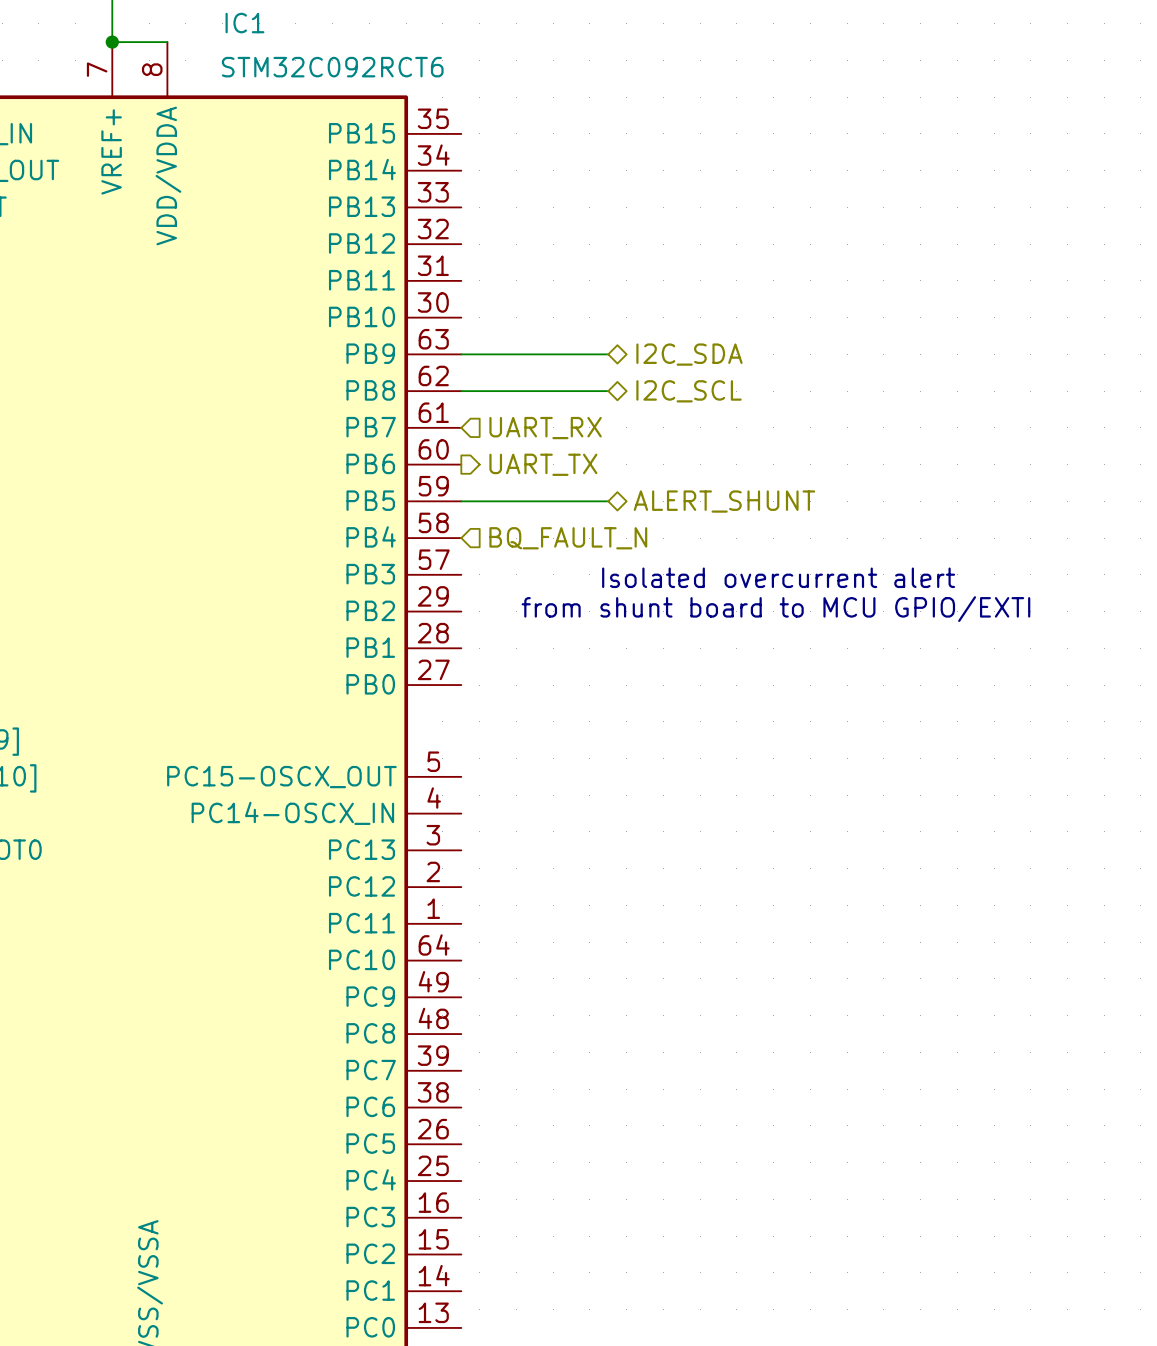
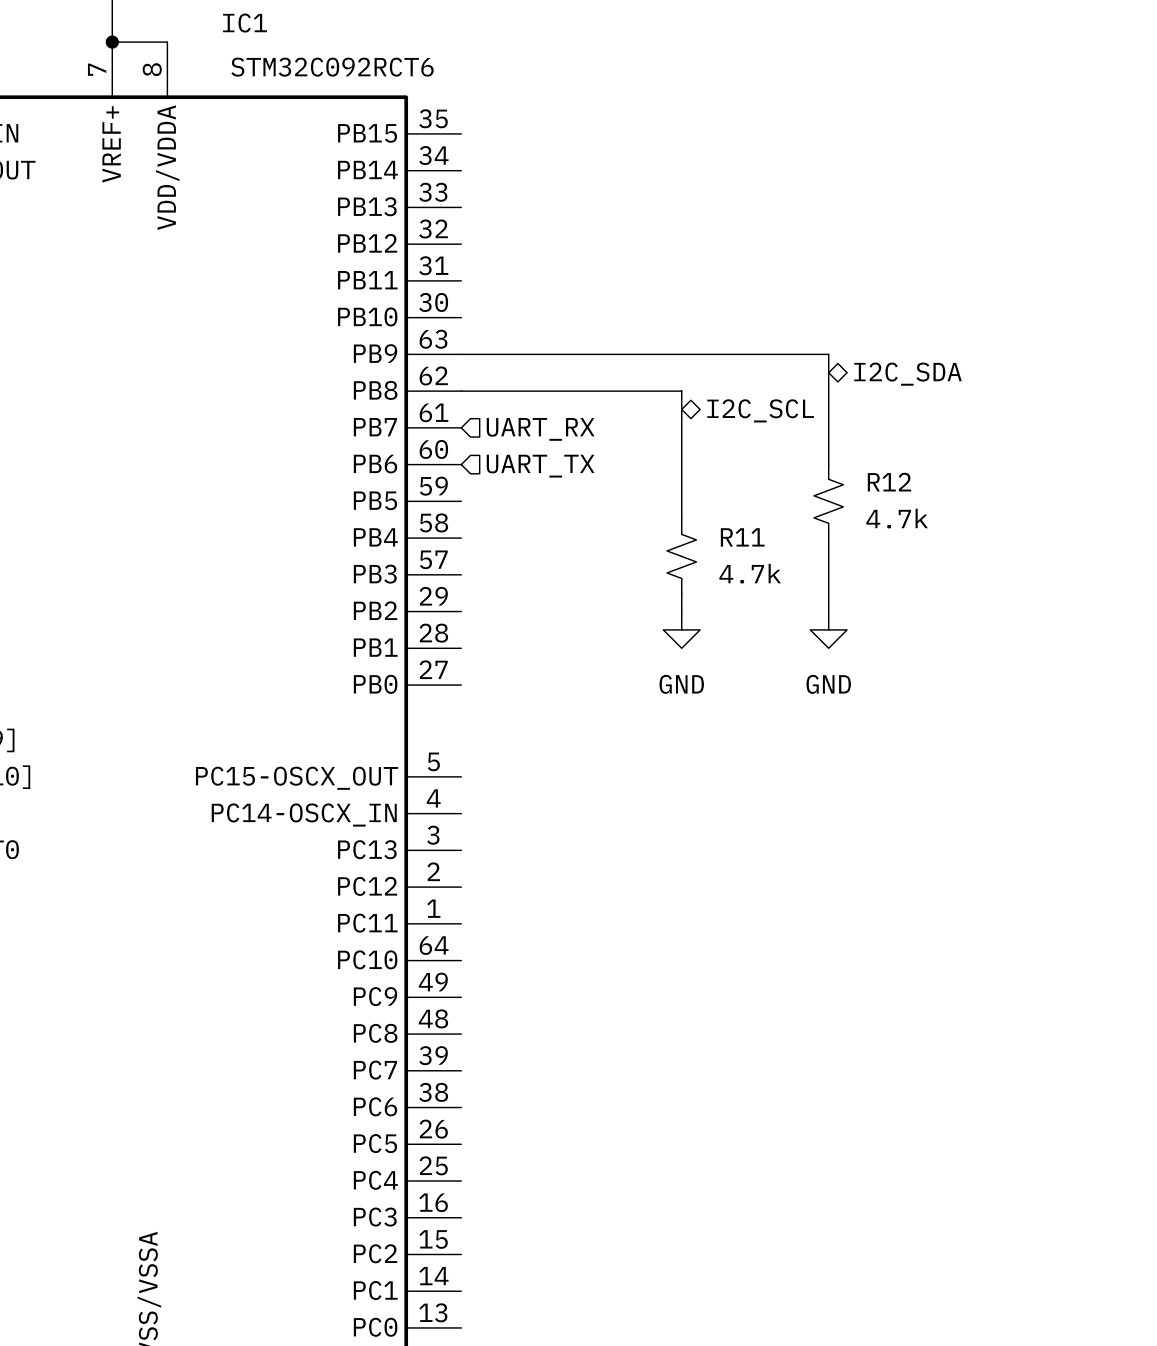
wire: none -> (608, 354) (828, 354) (828, 464)
hierarchical label position: I2C_SDA (689, 354) -> I2C_SDA (908, 374)
wire: none -> (608, 391) (681, 391) (681, 519)
hierarchical label position: I2C_SCL (689, 391) -> I2C_SCL (760, 410)
hierarchical label shape: output (543, 464) -> input (540, 466)
wire: (461, 501) (608, 501) -> none
hierarchical label: ALERT_SHUNT (724, 501) -> none
R12: none -> 4.7k (828, 501)
hierarchical label: BQ_FAULT_N (568, 538) -> none
wire: none -> (828, 538) (828, 611)
R11: none -> 4.7k (681, 556)
text: Isolated overcurrent alert (778, 577) -> none
wire: none -> (681, 593) (681, 611)
text: from shunt board to MCU GPIO/EXTI (775, 609) -> none
power symbol: none -> GND (681, 629)
power symbol: none -> GND (828, 629)

